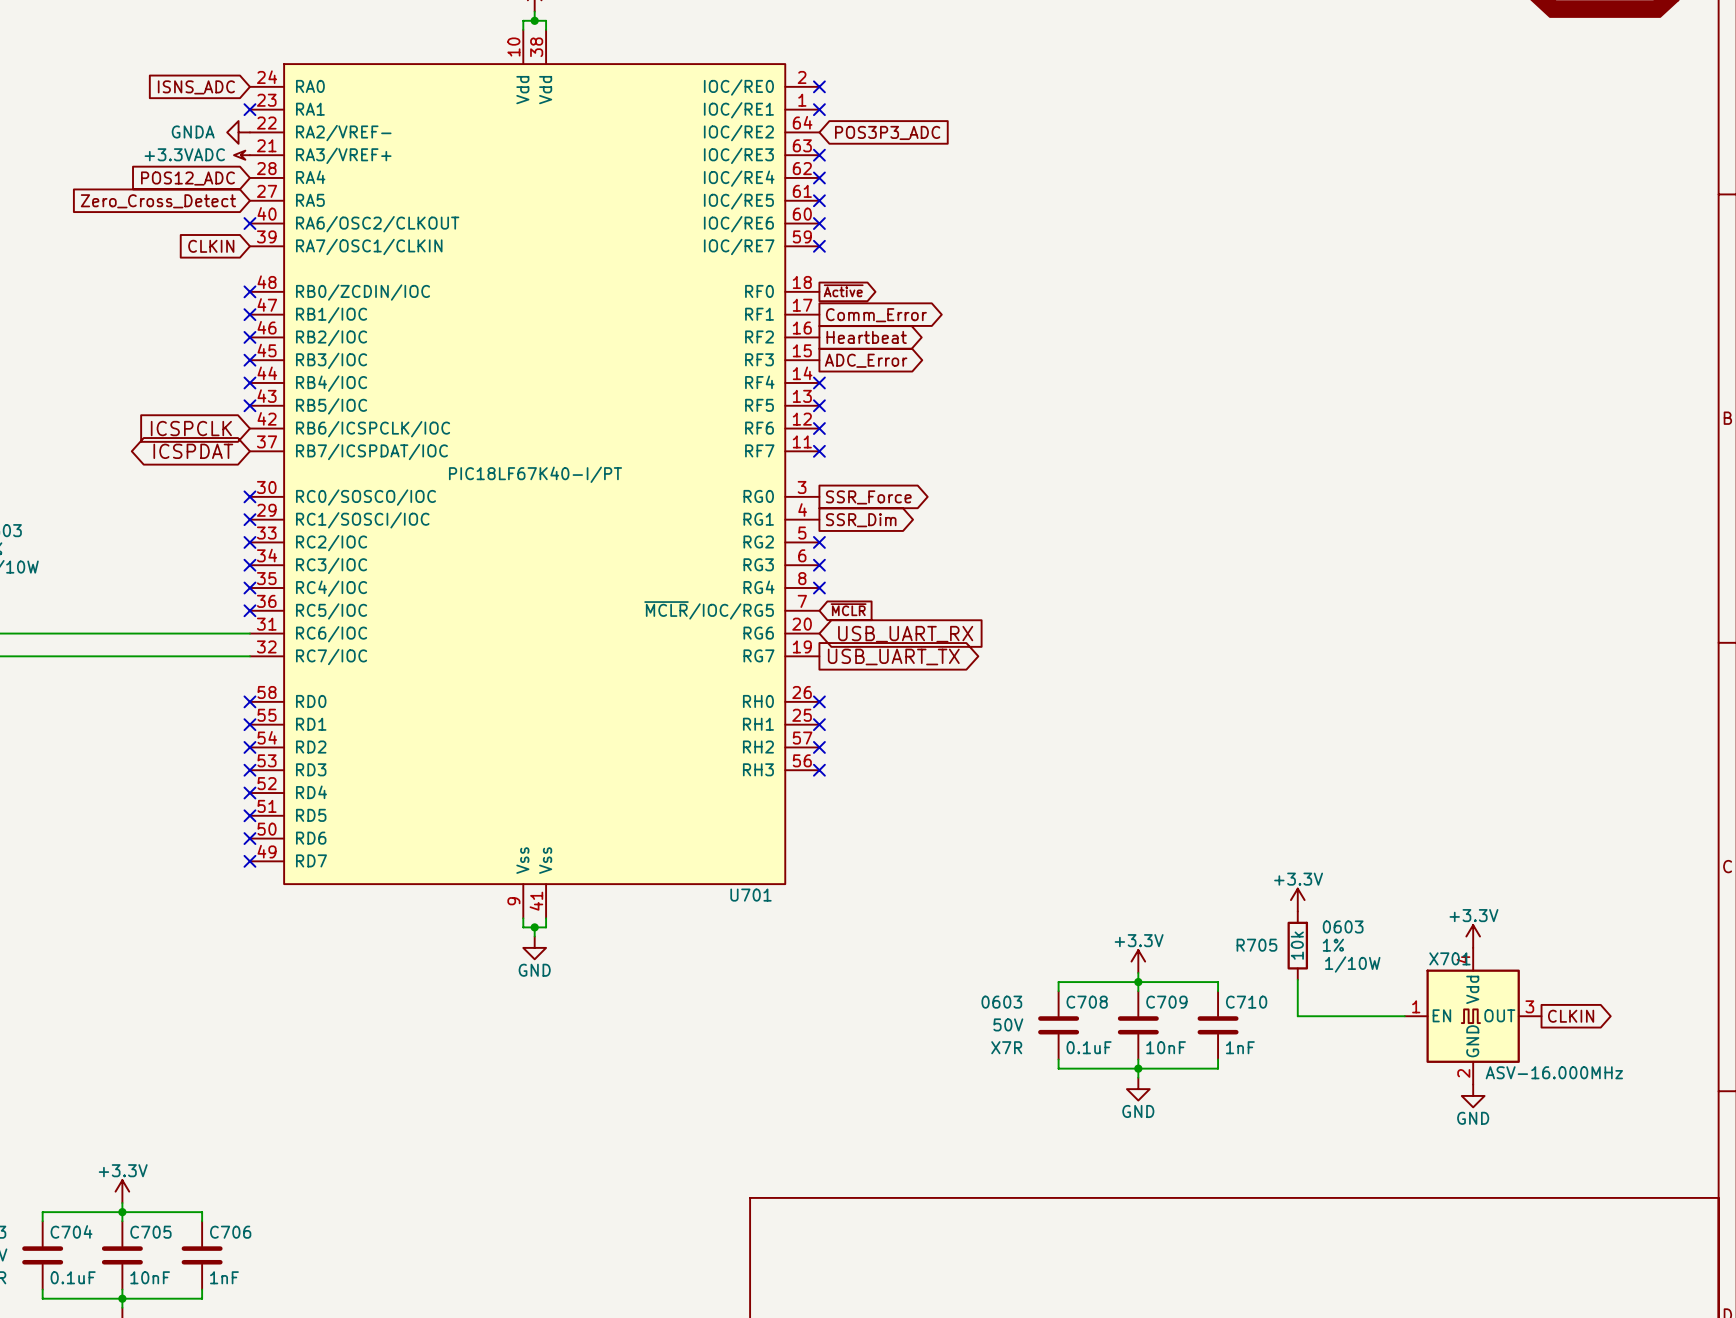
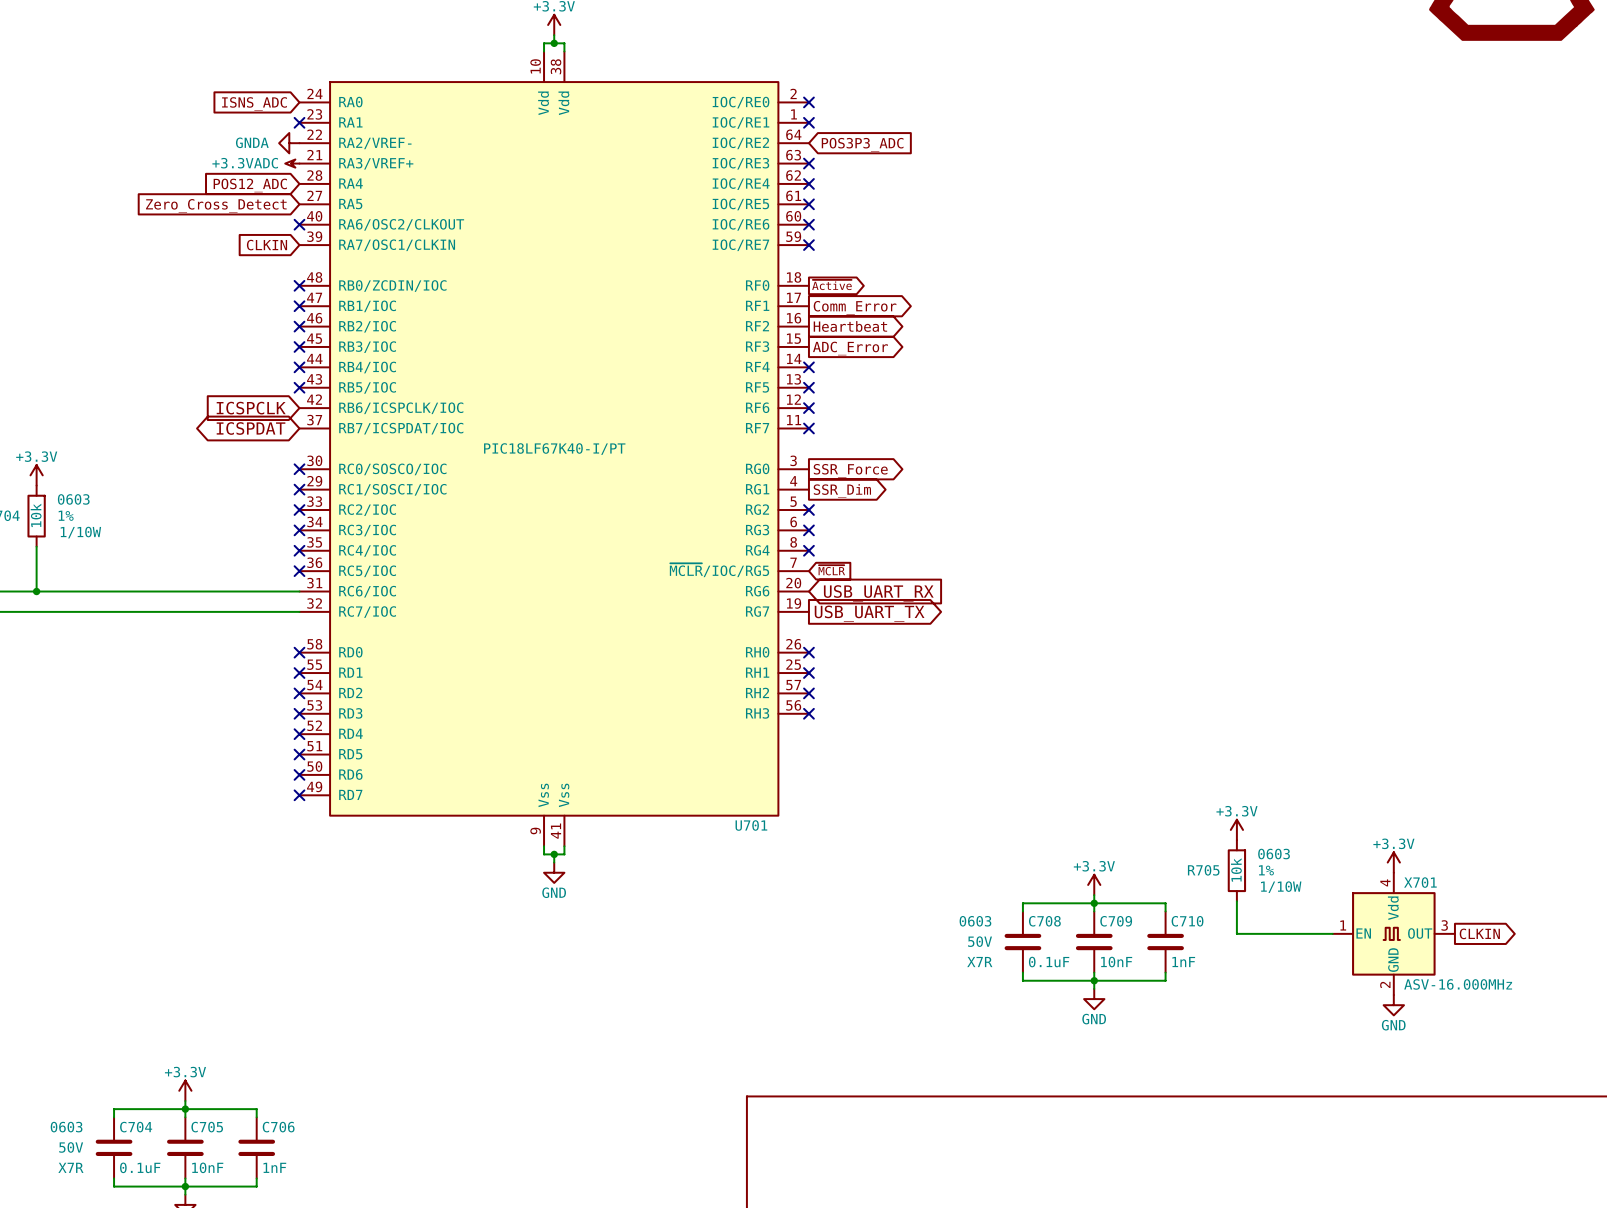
X701 name position: X701 (1449, 958) -> X701 (1420, 882)

